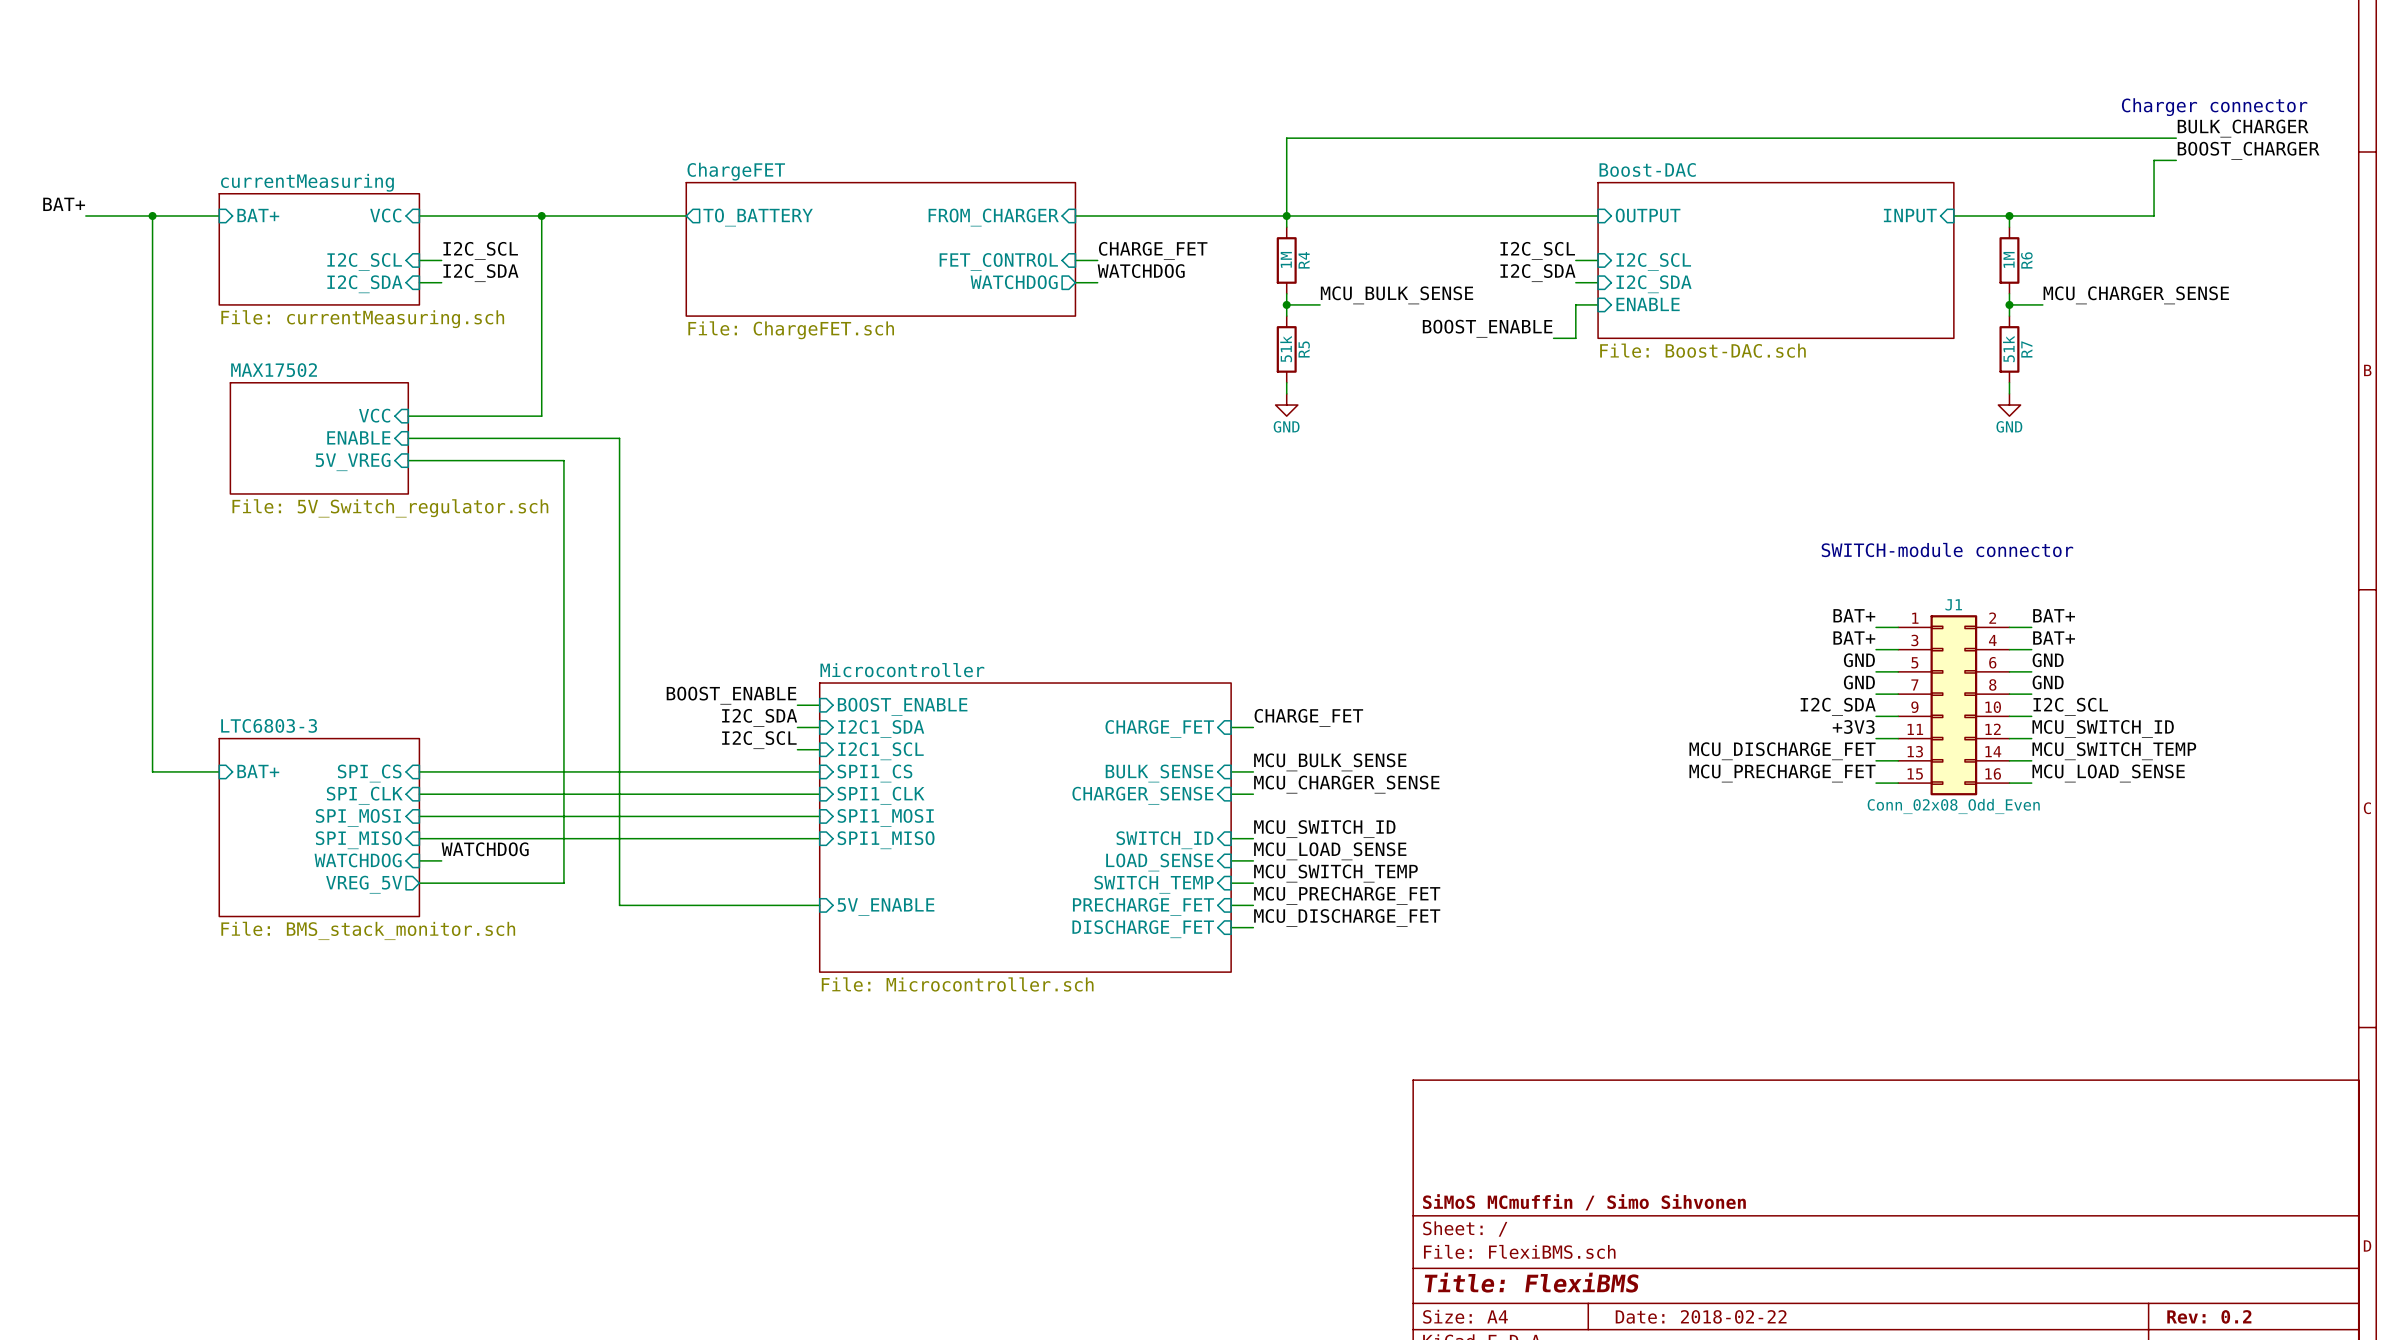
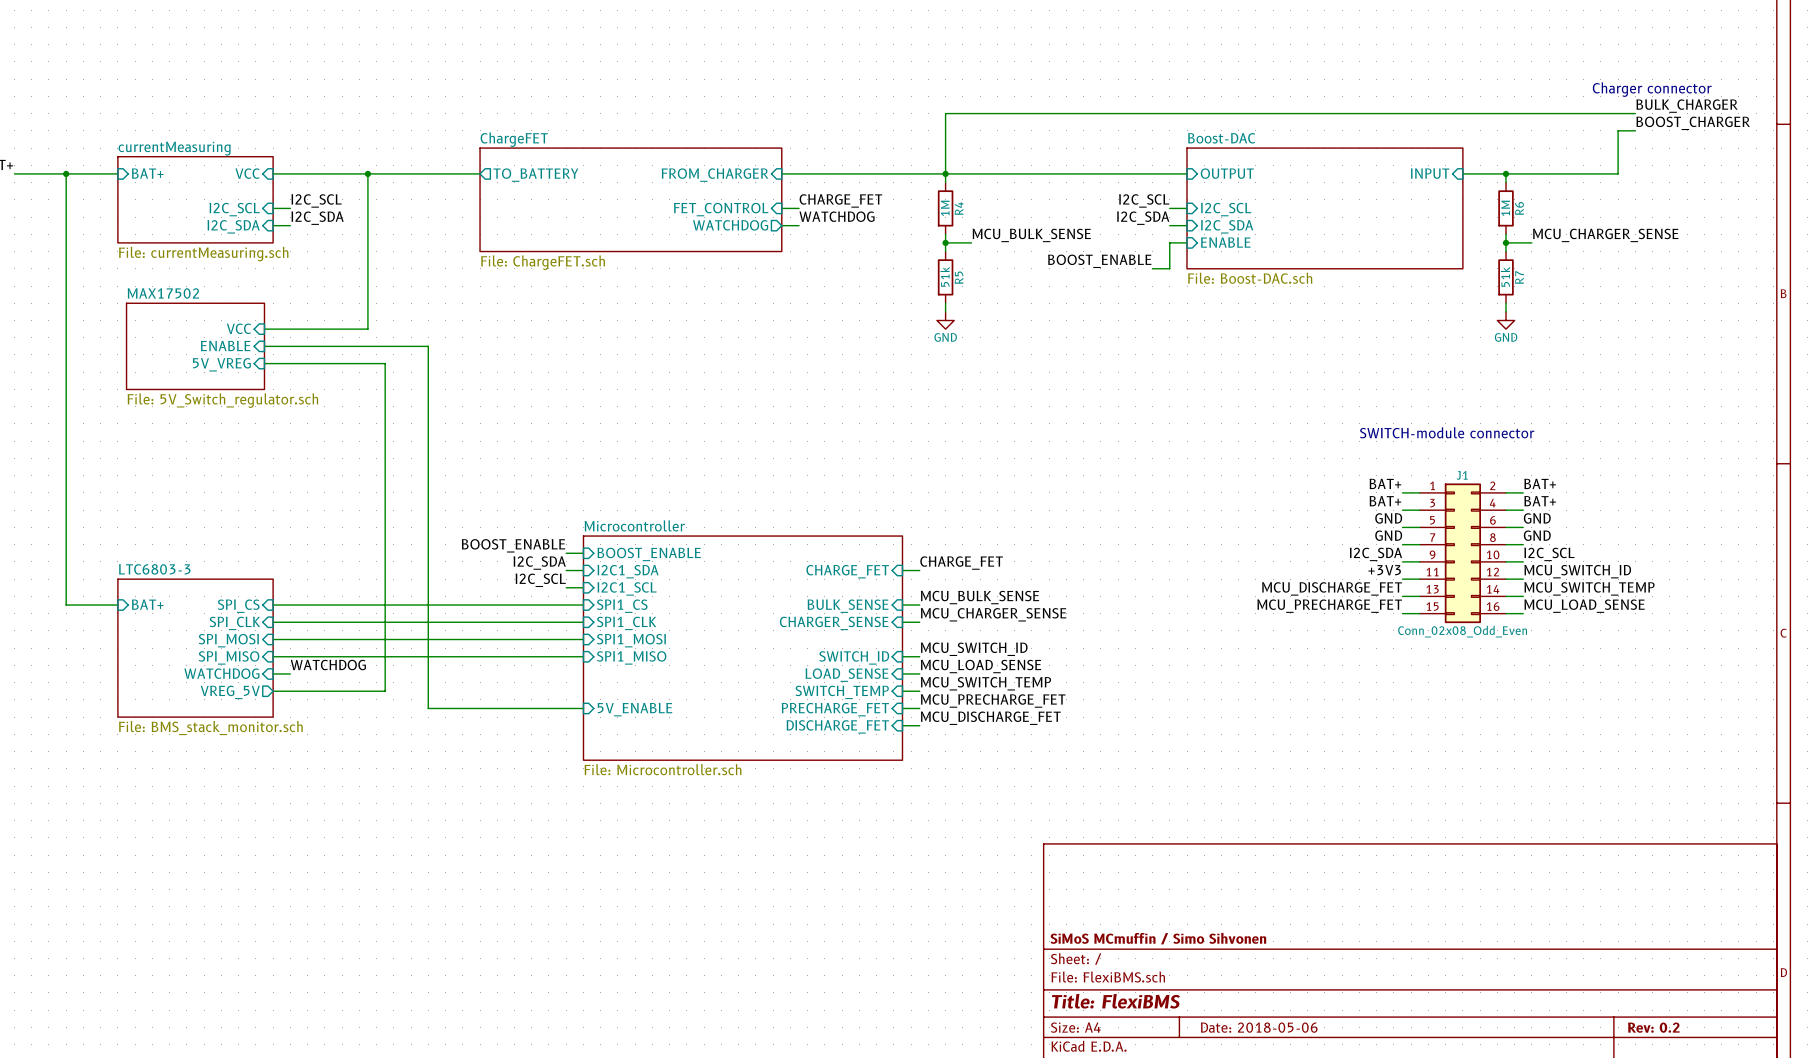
title block: Date: 2018-02-22 (1701, 1316) -> Date: 2018-05-06 (1259, 1027)

